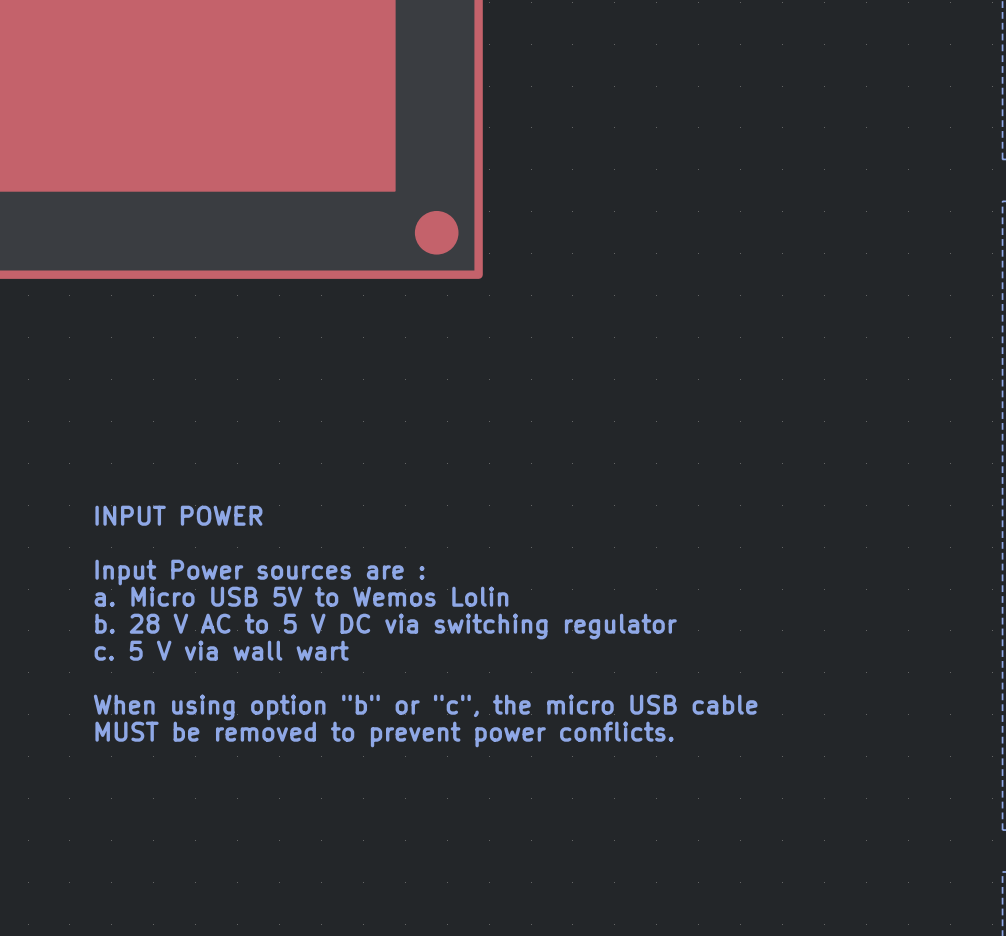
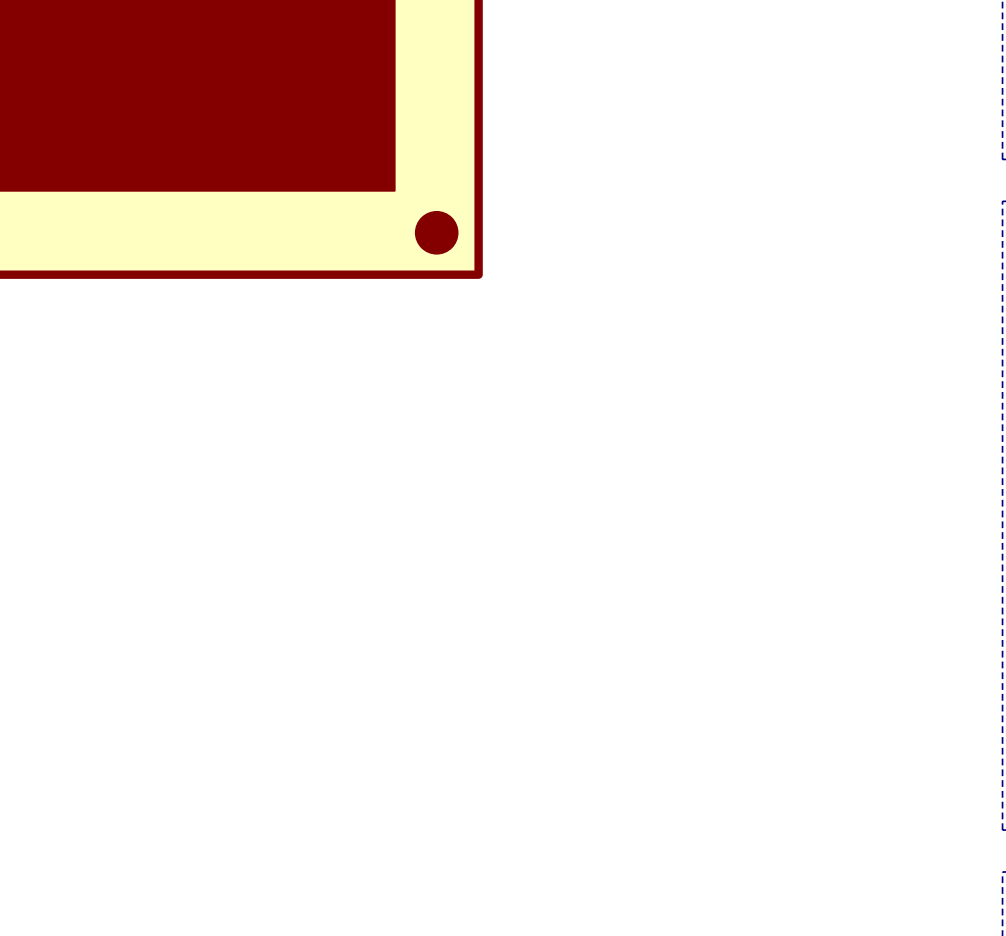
text: INPUT POWER (178, 515) -> none
text: Input Power sources are : (259, 572) -> none
text: a. Micro USB 5V to Wemos Lolin (301, 596) -> none
text: b. 28 V AC to 5 V DC via switching regulator (386, 626) -> none
text: c. 5 V via wall wart (221, 650) -> none
text: When using option "b" or "c", the micro USB cable (425, 707) -> none
text: MUST be removed to prevent power conflicts. (384, 734) -> none

